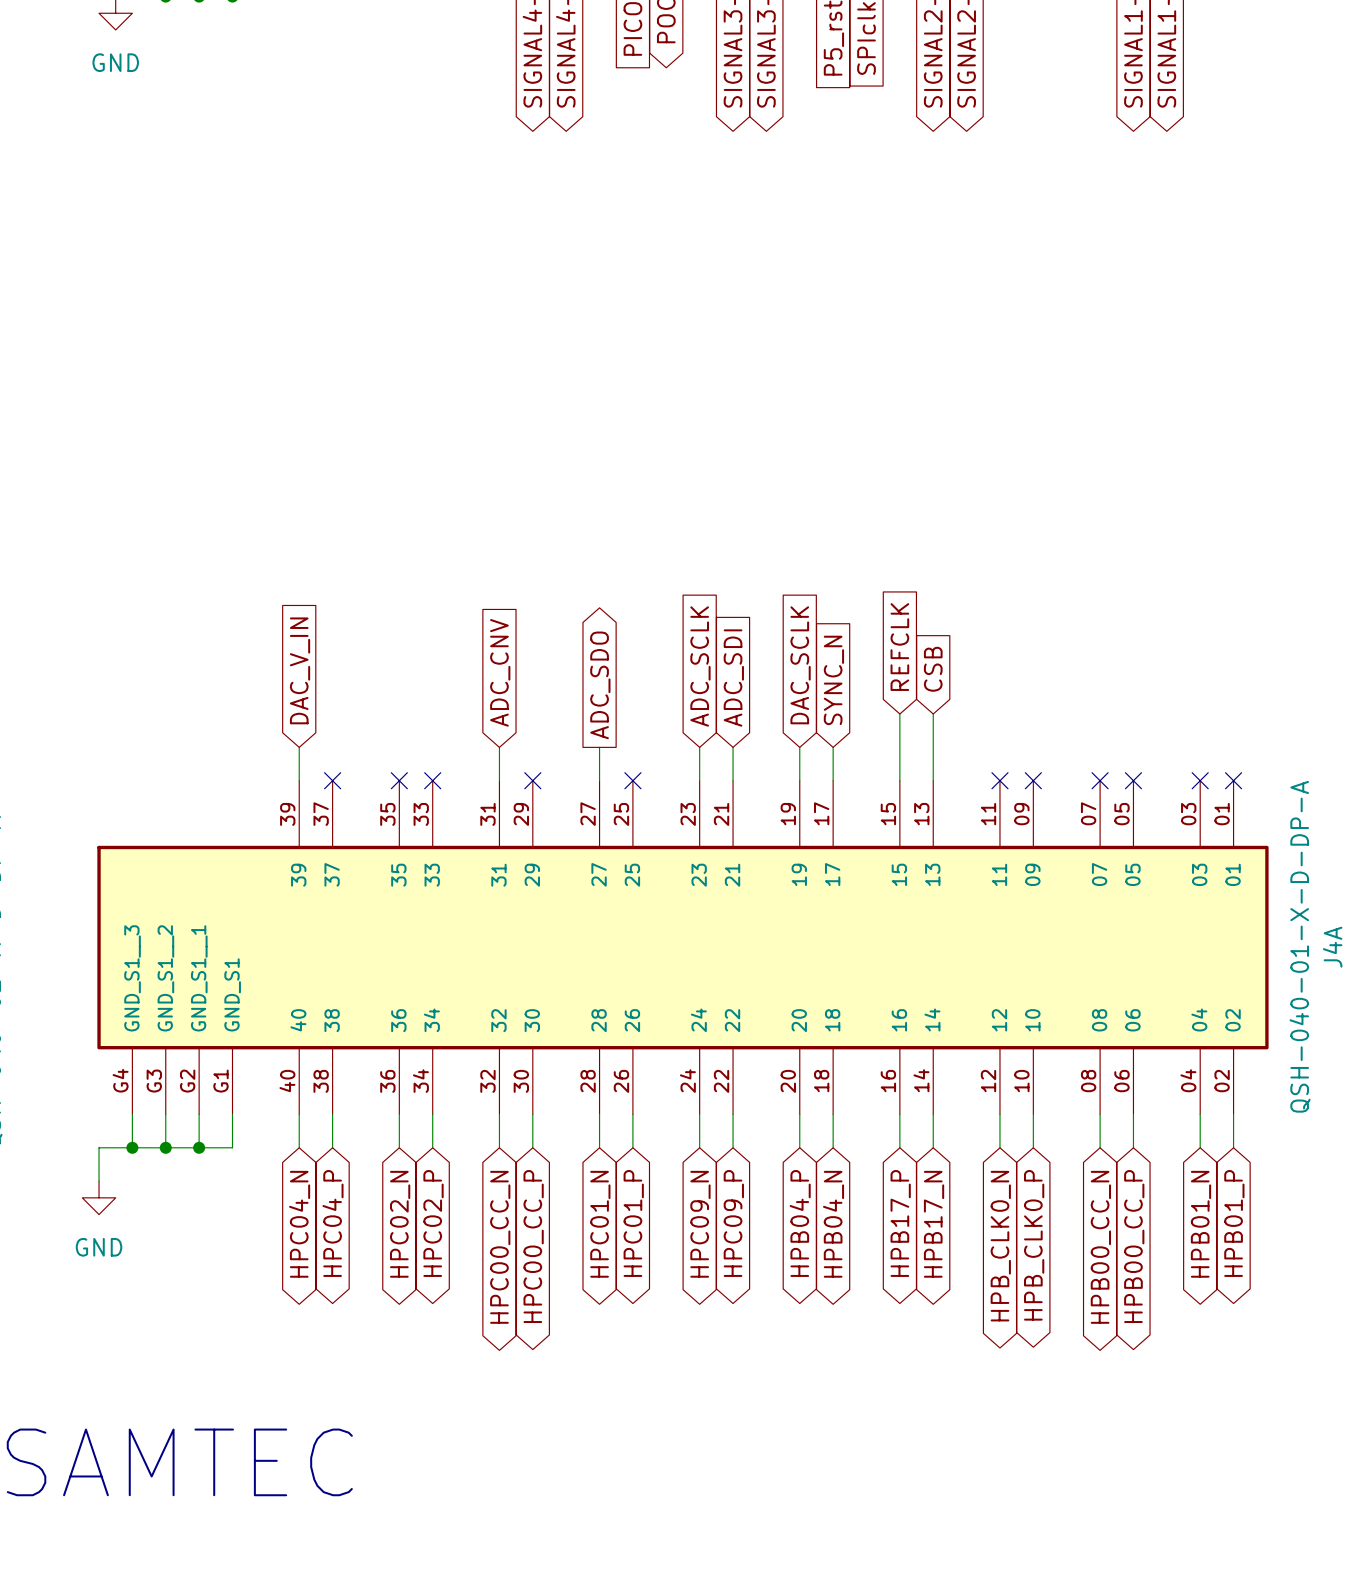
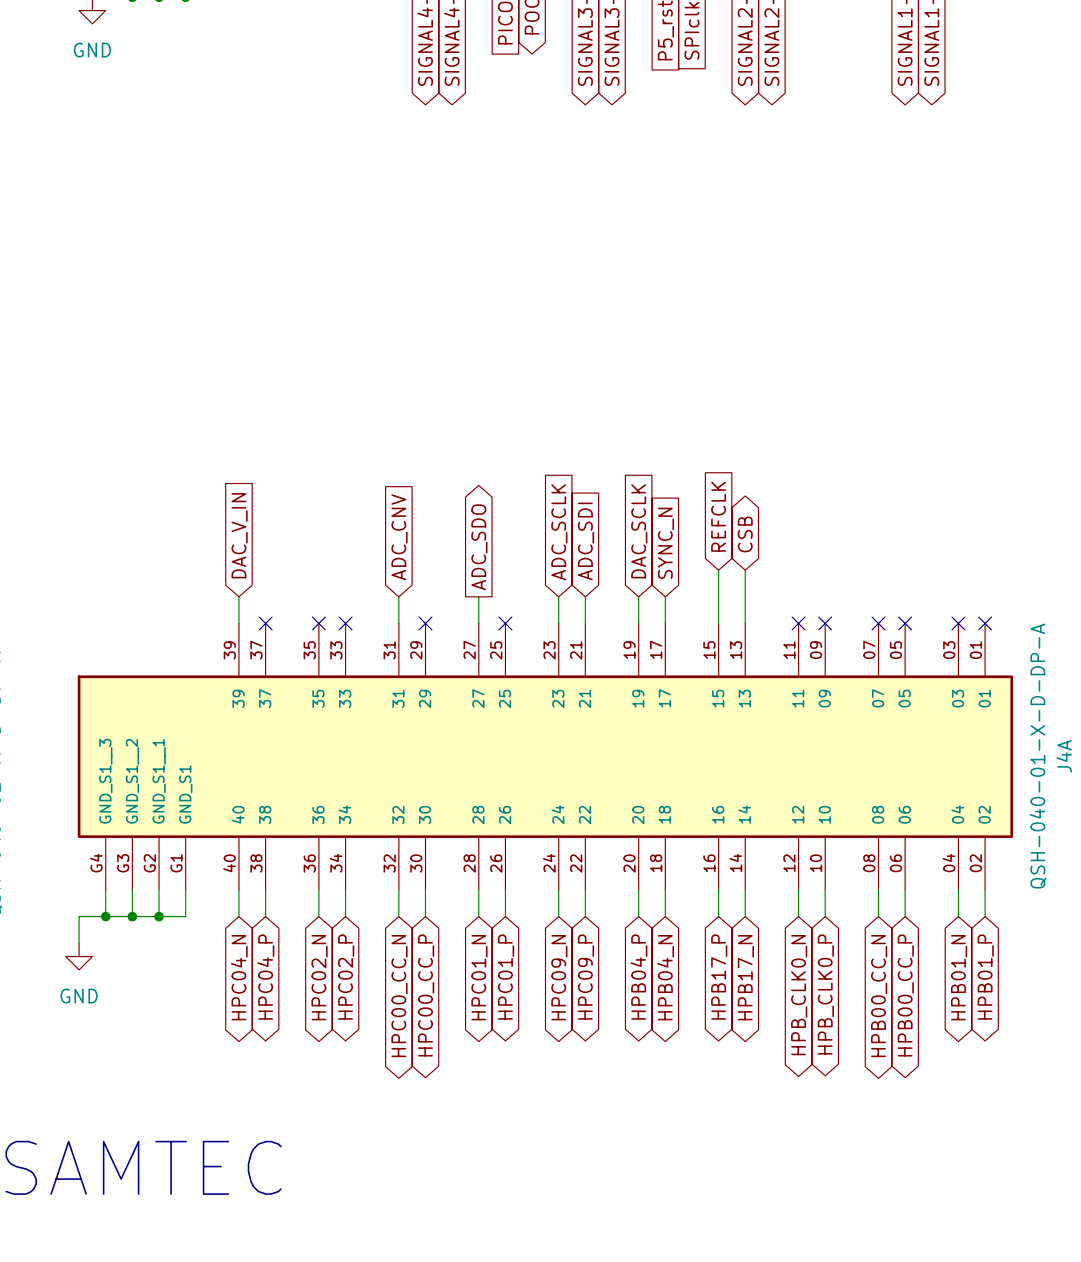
global label shape: input (933, 669) -> bidirectional (745, 534)

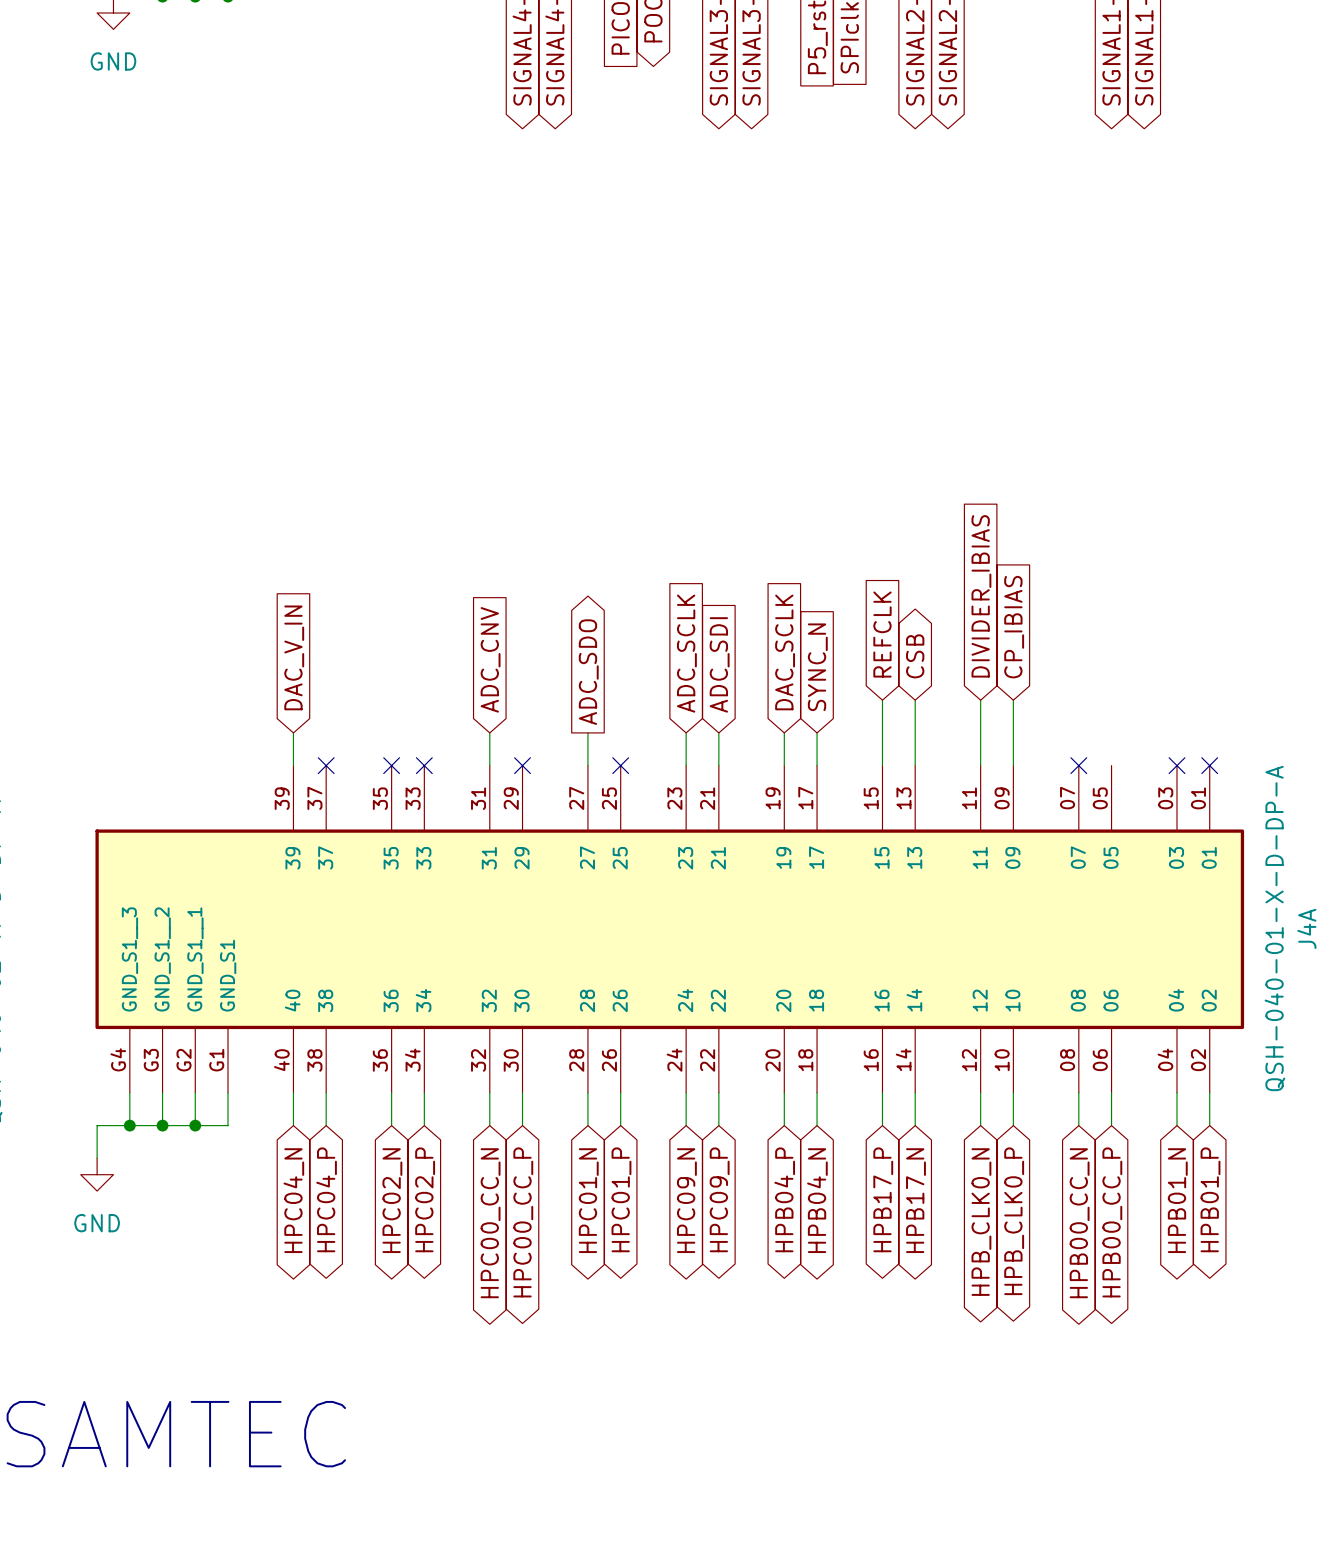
global label: none -> DIVIDER_IBIAS (981, 596)
global label: none -> CP_IBIAS (1014, 627)
wire: none -> (980, 700) (980, 765)
wire: none -> (1013, 700) (1013, 765)
no-connect mark: (798, 623) -> none
no-connect mark: (825, 623) -> none
no-connect mark: (905, 623) -> none

